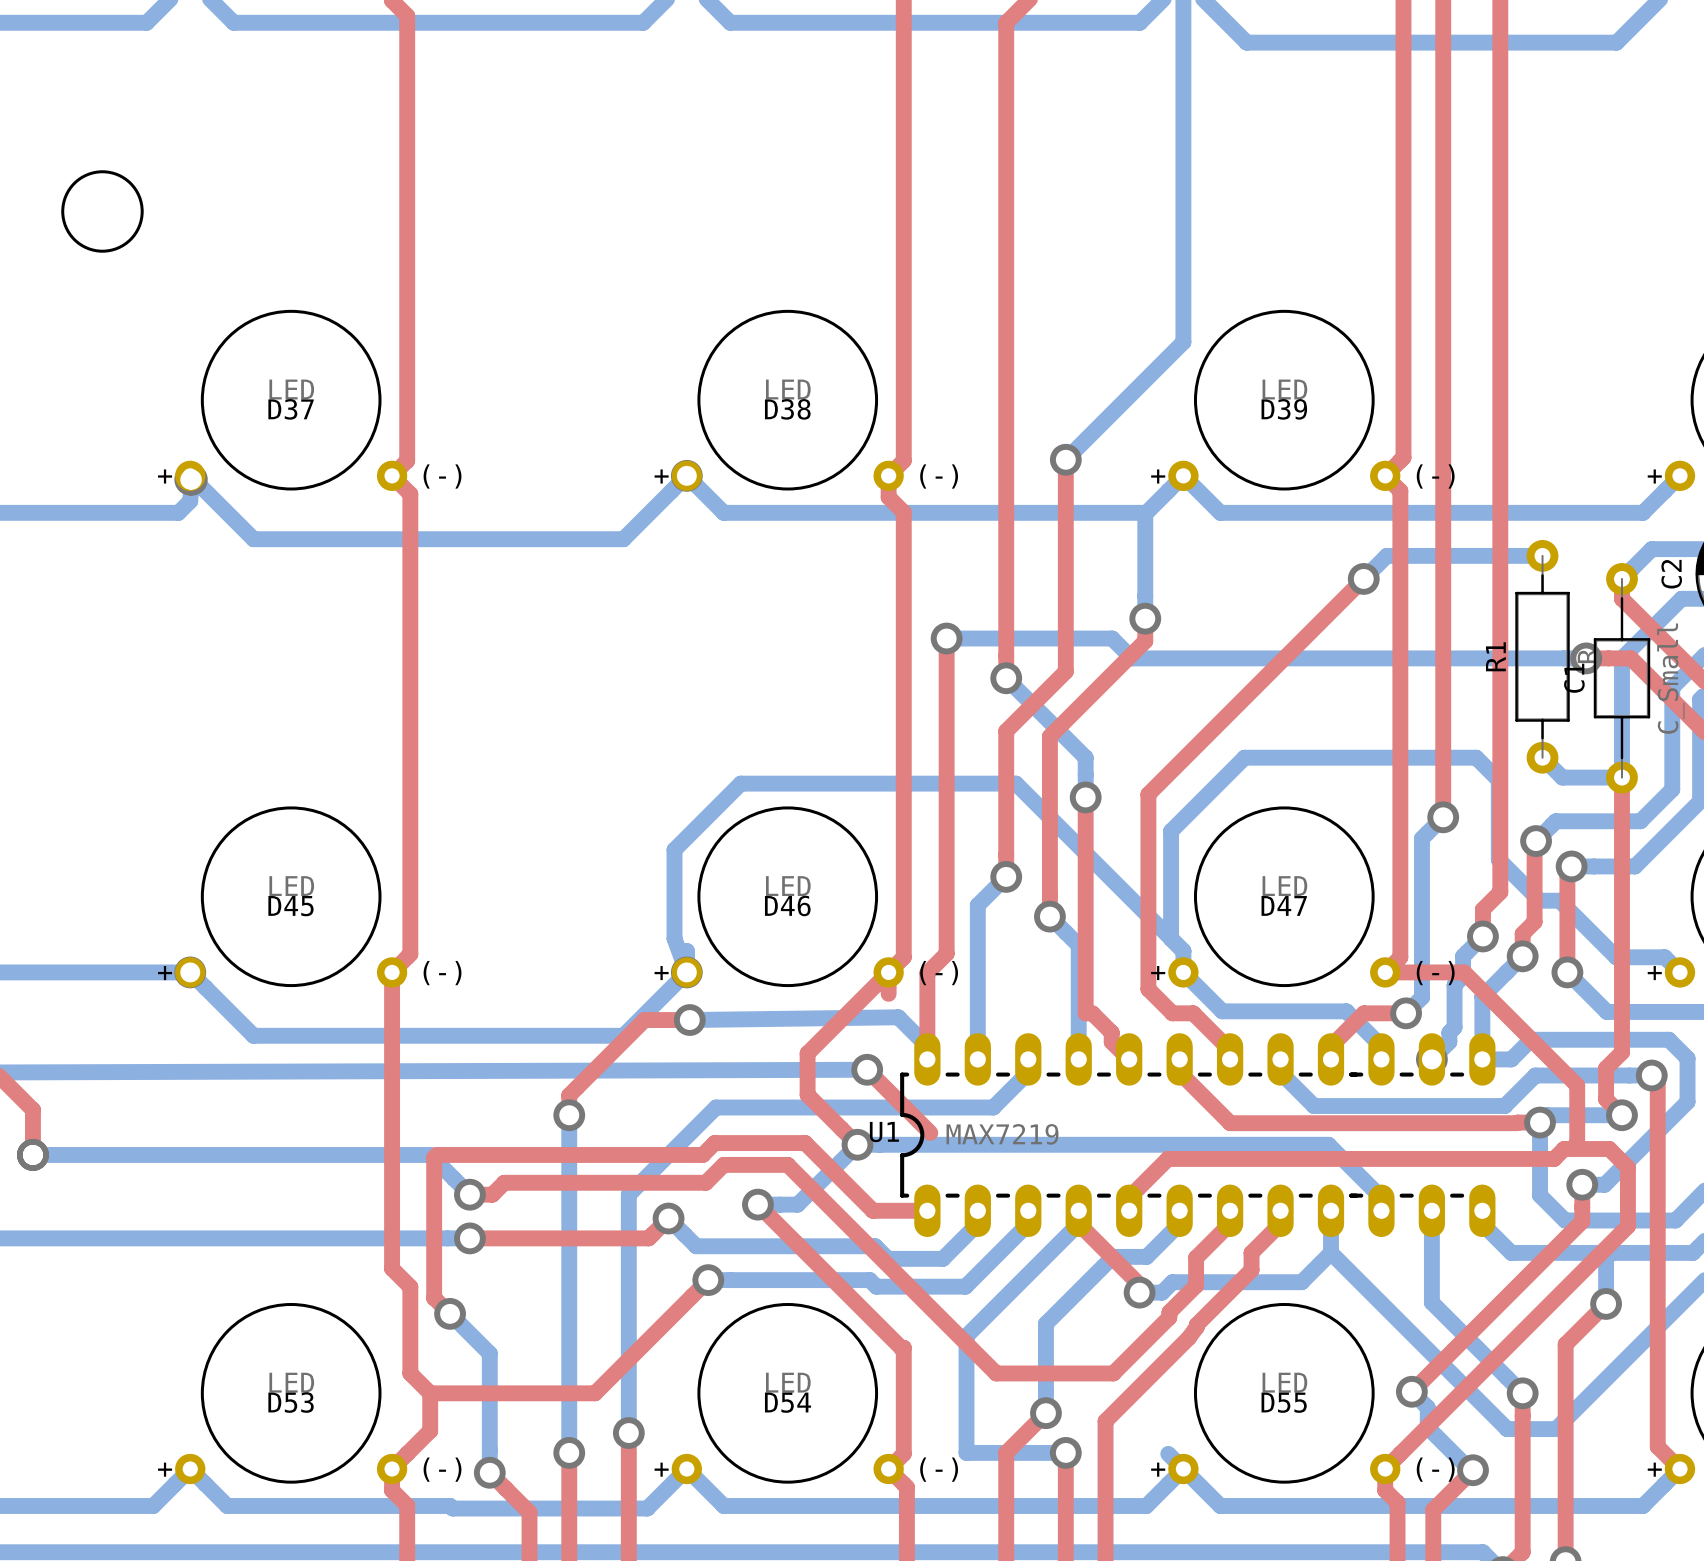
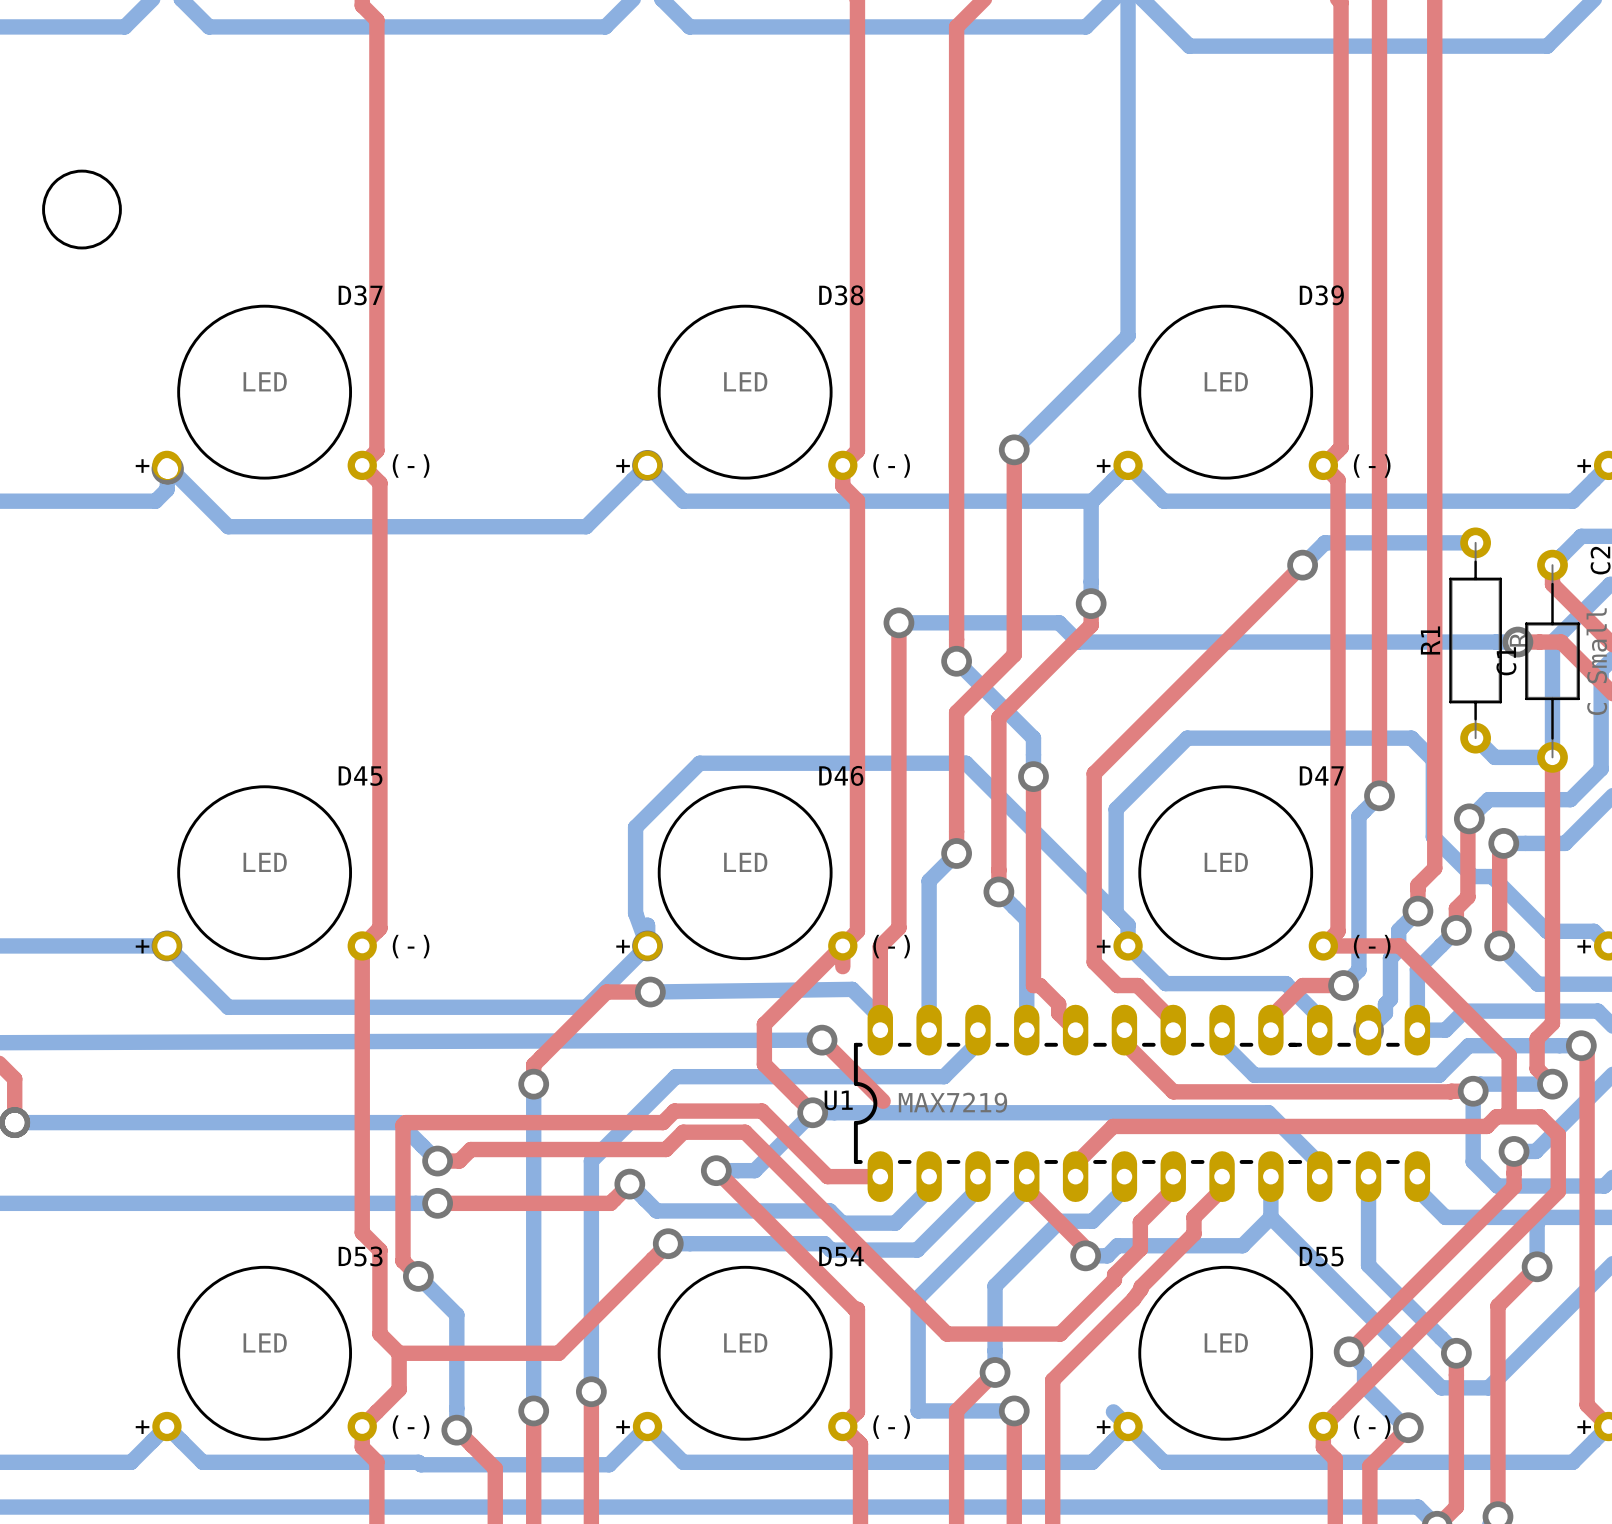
D37 name position: D37 (291, 409) -> D37 (360, 295)
D38 name position: D38 (787, 409) -> D38 (841, 295)
D39 name position: D39 (1284, 409) -> D39 (1321, 295)
D46 name position: D46 (787, 905) -> D46 (841, 775)
D47 name position: D47 (1284, 905) -> D47 (1321, 775)
D45 name position: D45 (290, 906) -> D45 (360, 776)
D53 name position: D53 (291, 1402) -> D53 (360, 1256)
D54 name position: D54 (788, 1402) -> D54 (841, 1256)
D55 name position: D55 (1284, 1402) -> D55 (1321, 1256)

